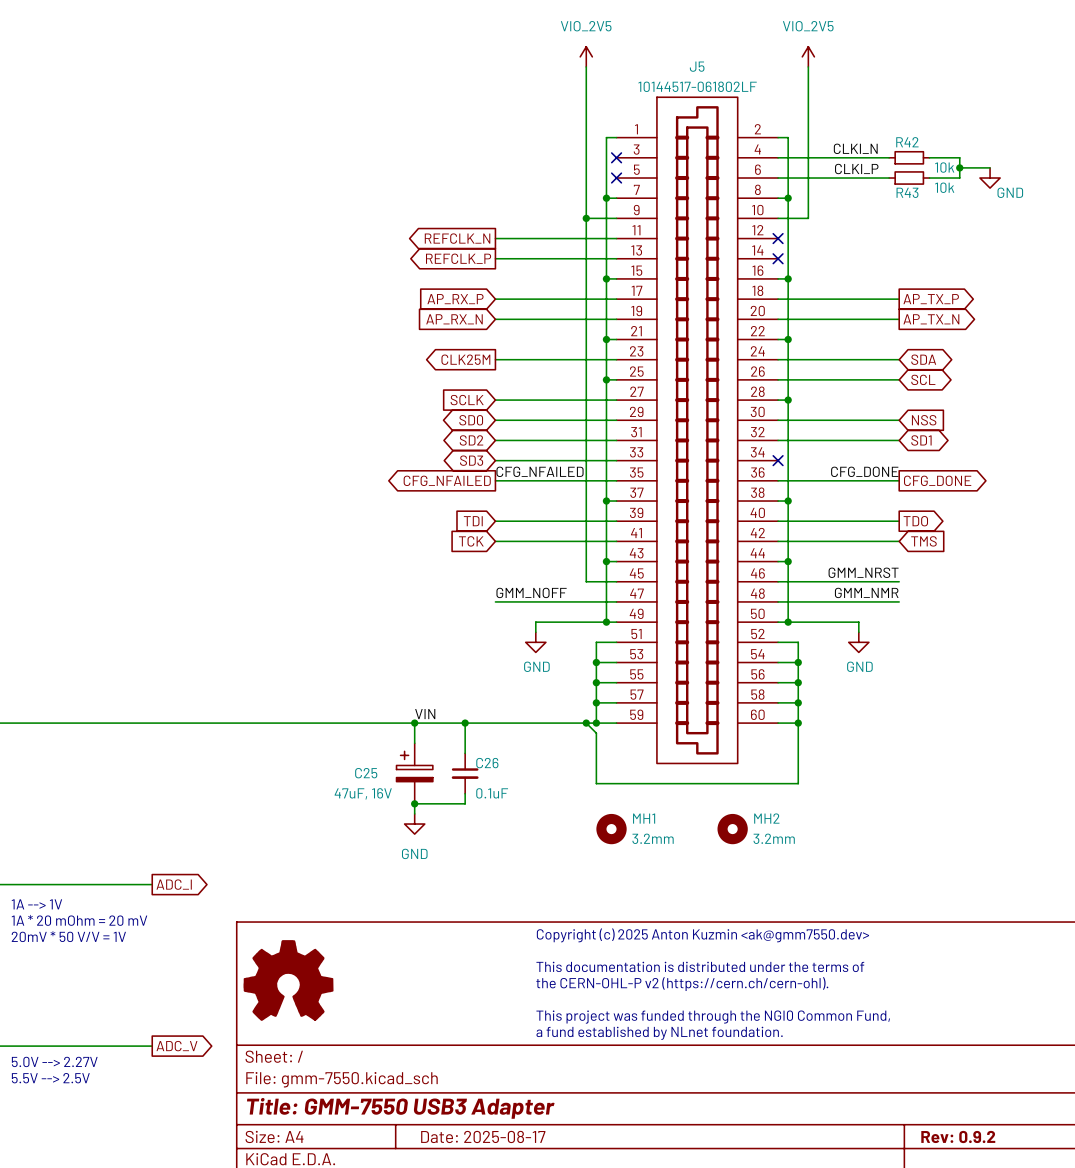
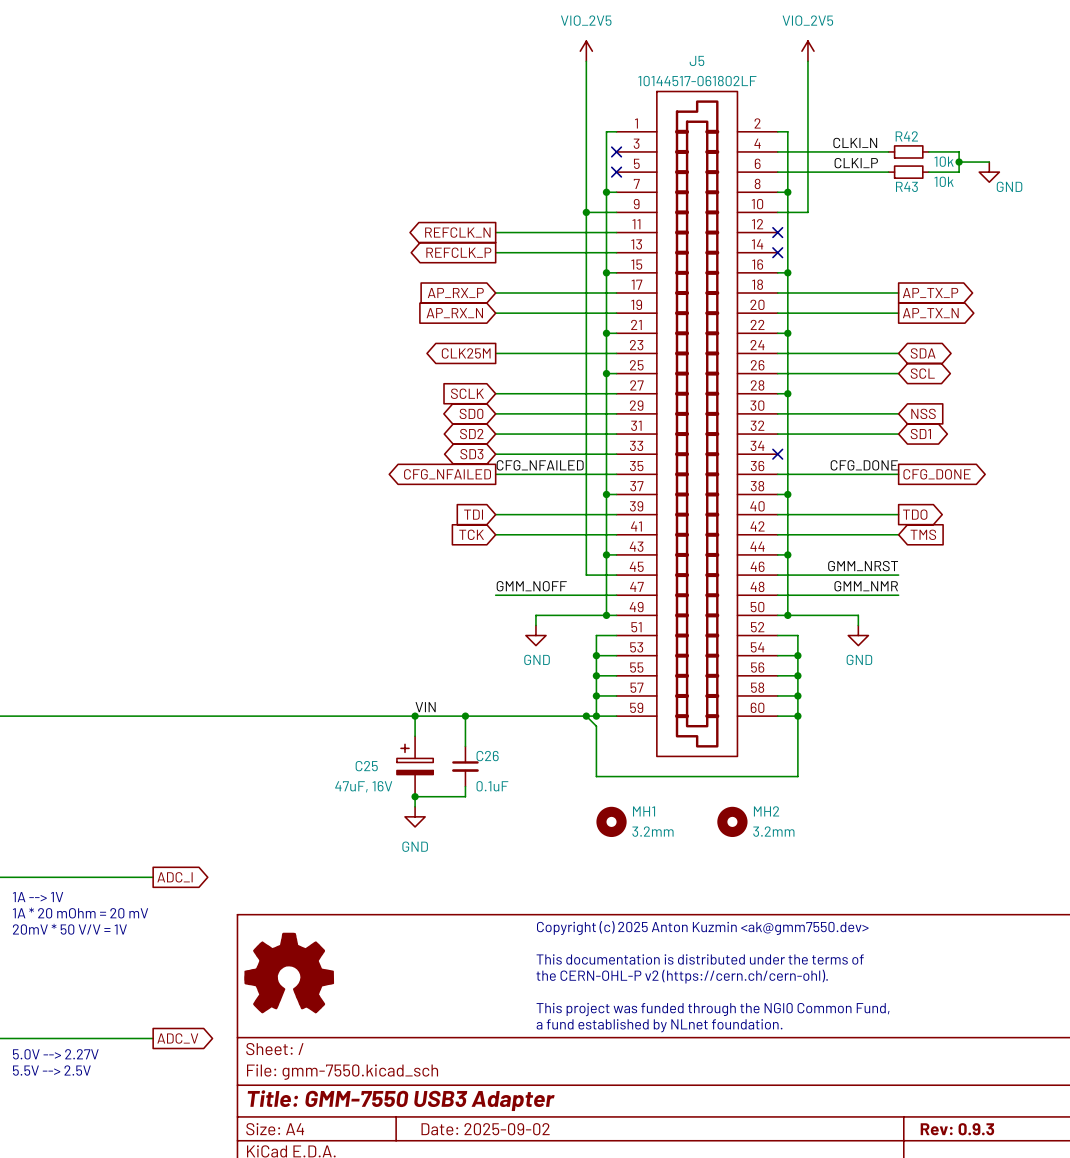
title block: Date: 2025-08-17 (483, 1136) -> Date: 2025-09-02 (485, 1129)
title block: Rev: 0.9.2 (958, 1136) -> Rev: 0.9.3 (957, 1129)

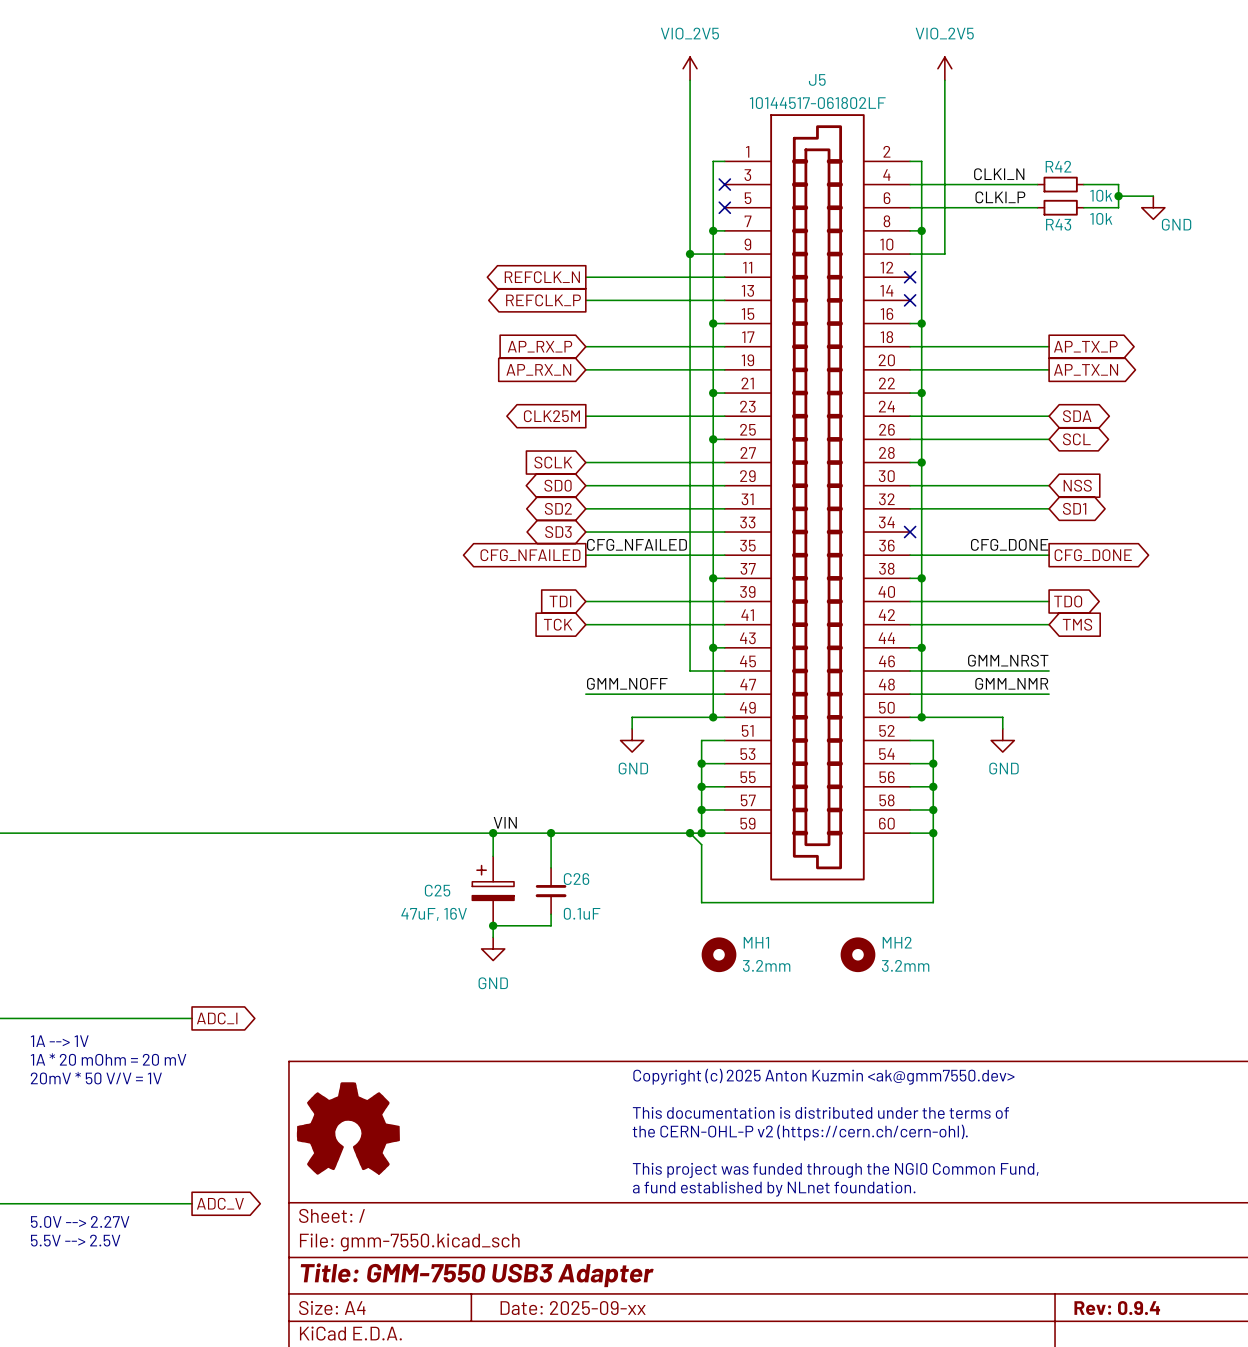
title block: Date: 2025-09-02 (485, 1129) -> Date: 2025-09-xx (573, 1308)
title block: Rev: 0.9.3 (957, 1129) -> Rev: 0.9.4 (1117, 1308)

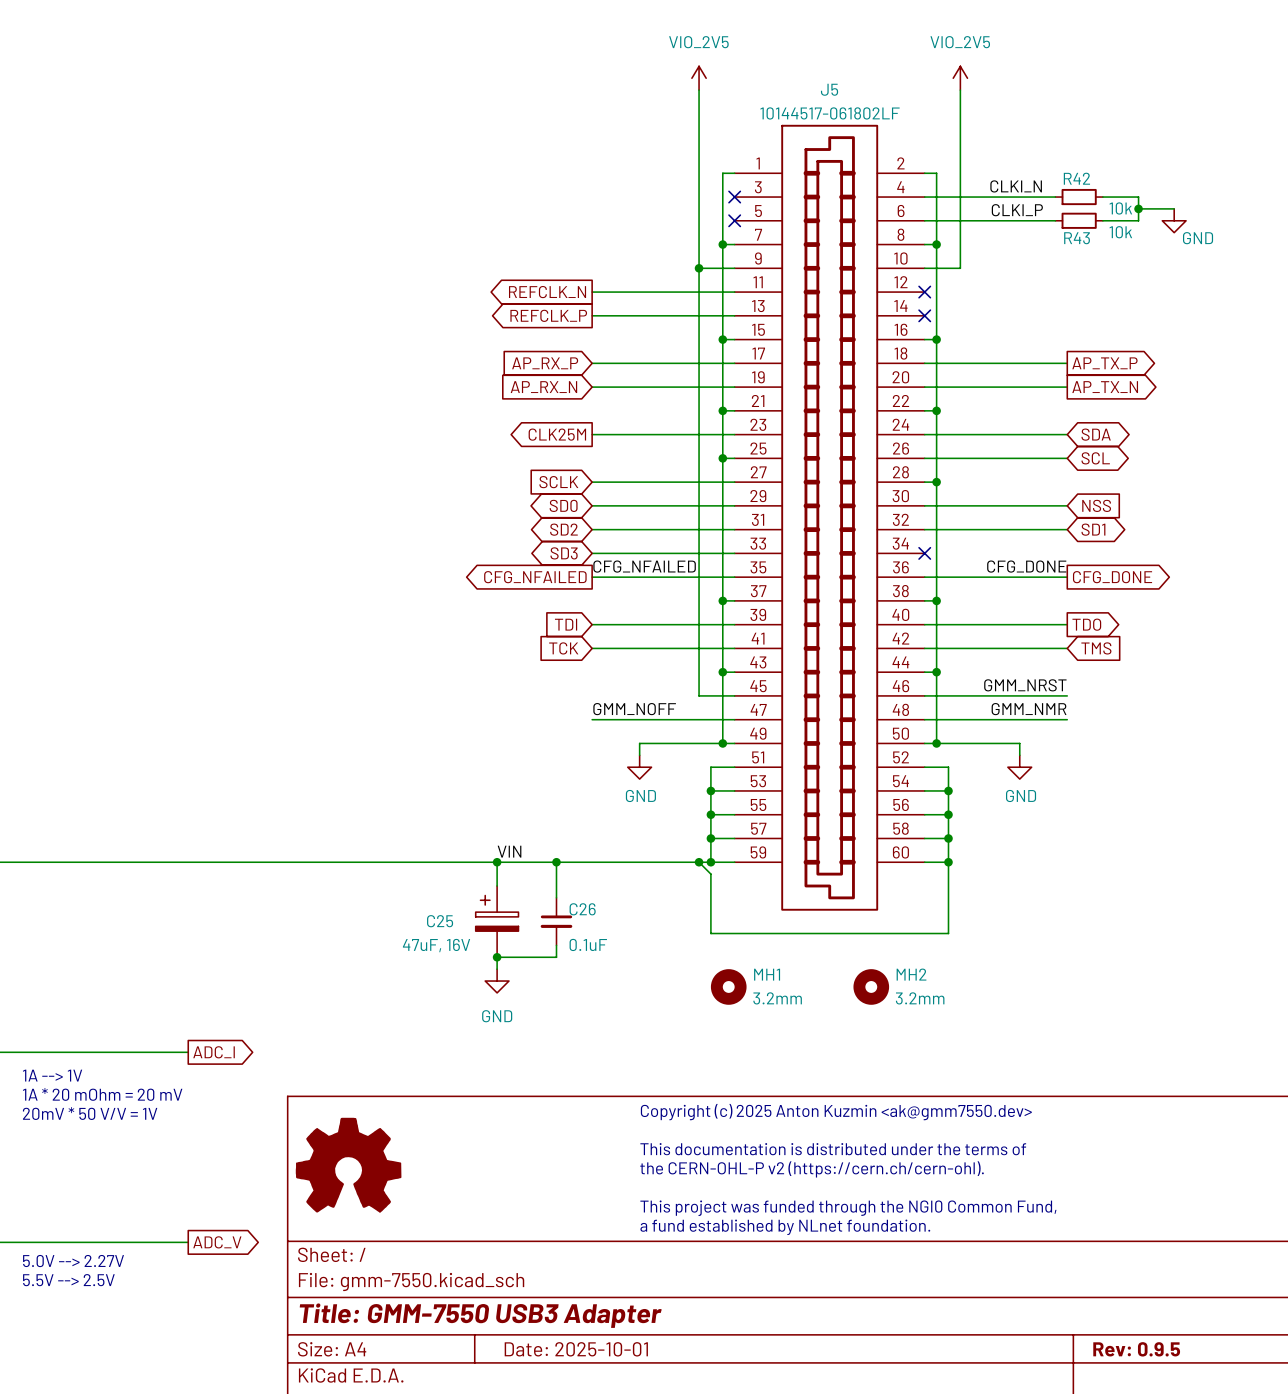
title block: Date: 2025-09-xx (573, 1308) -> Date: 2025-10-01 (576, 1349)
title block: Rev: 0.9.4 (1117, 1308) -> Rev: 0.9.5 (1136, 1349)

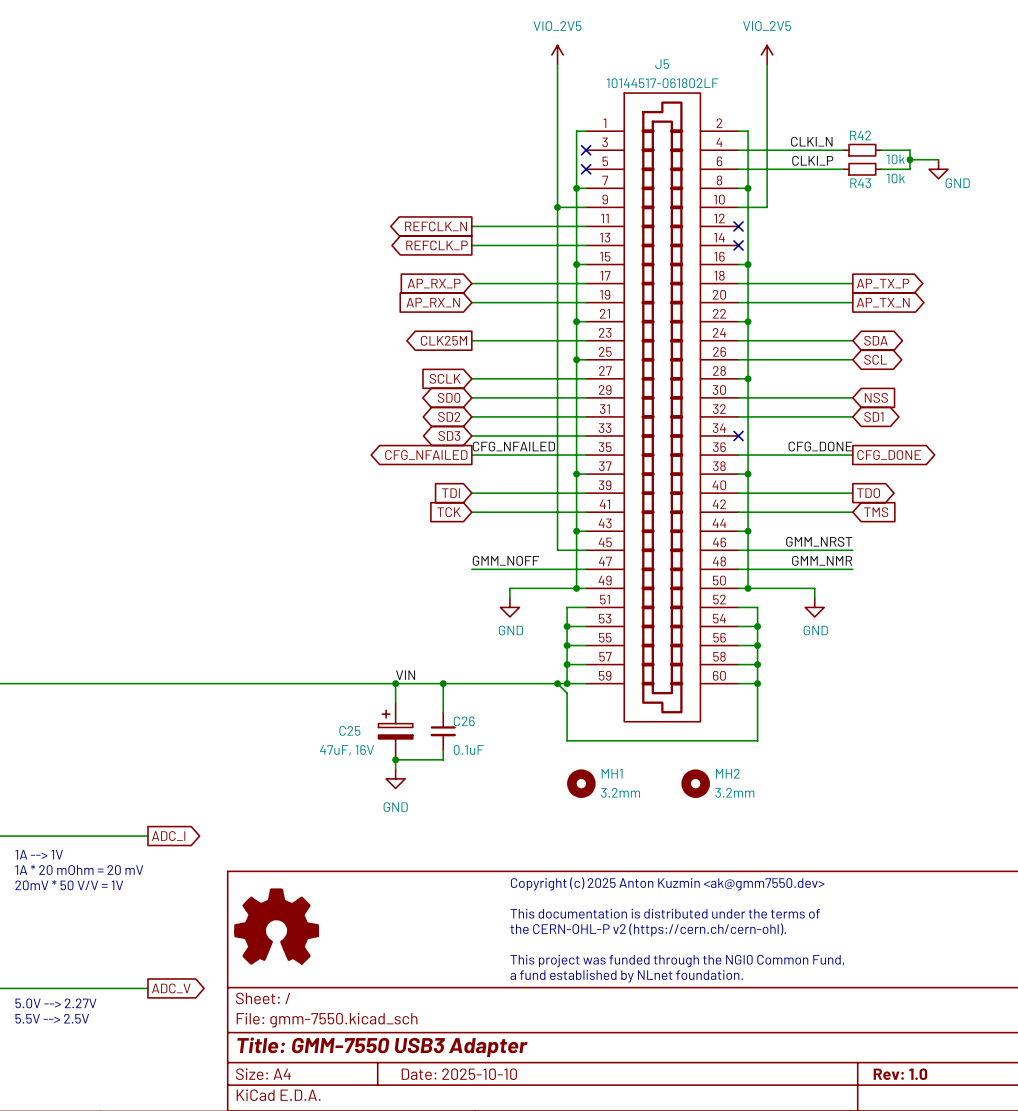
title block: Date: 2025-10-01 (576, 1349) -> Date: 2025-10-10 (459, 1074)
title block: Rev: 0.9.5 (1136, 1349) -> Rev: 1.0 (900, 1074)

